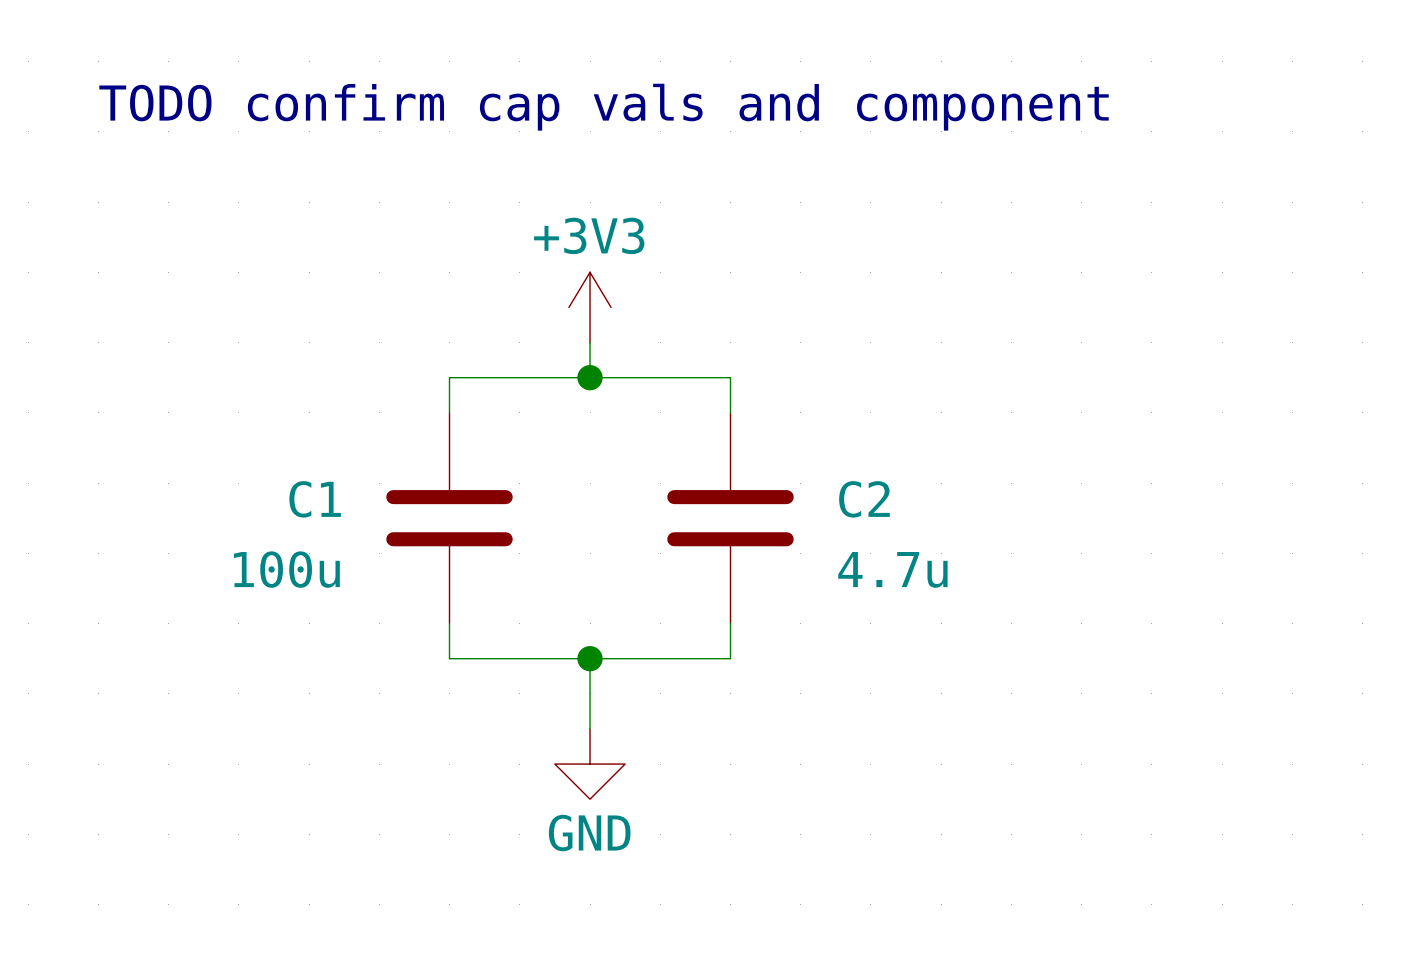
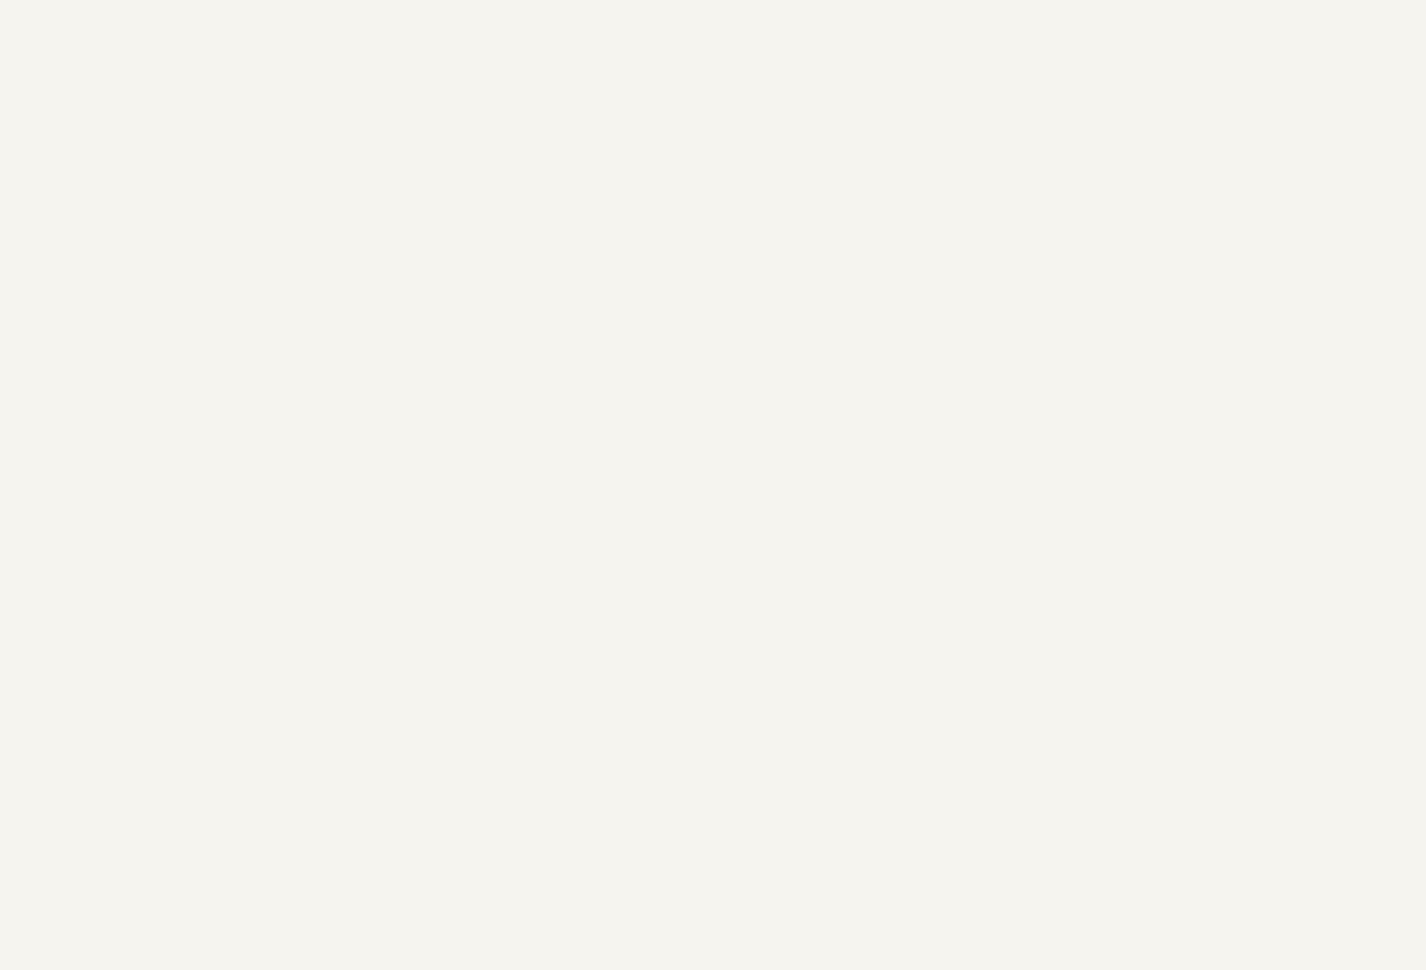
text: TODO confirm cap vals and component (604, 107) -> none
power symbol: +3V3 (590, 307) -> none
wire: (590, 342) (590, 377) -> none
junction: (590, 377) -> none
wire: (449, 412) (449, 377) (730, 377) (730, 412) -> none
C1: 100u (449, 518) -> none
C2: 4.7u (730, 518) -> none
wire: (449, 623) (449, 658) (730, 658) (730, 623) -> none
wire: (590, 658) (590, 728) -> none
junction: (590, 658) -> none
power symbol: GND (590, 764) -> none

